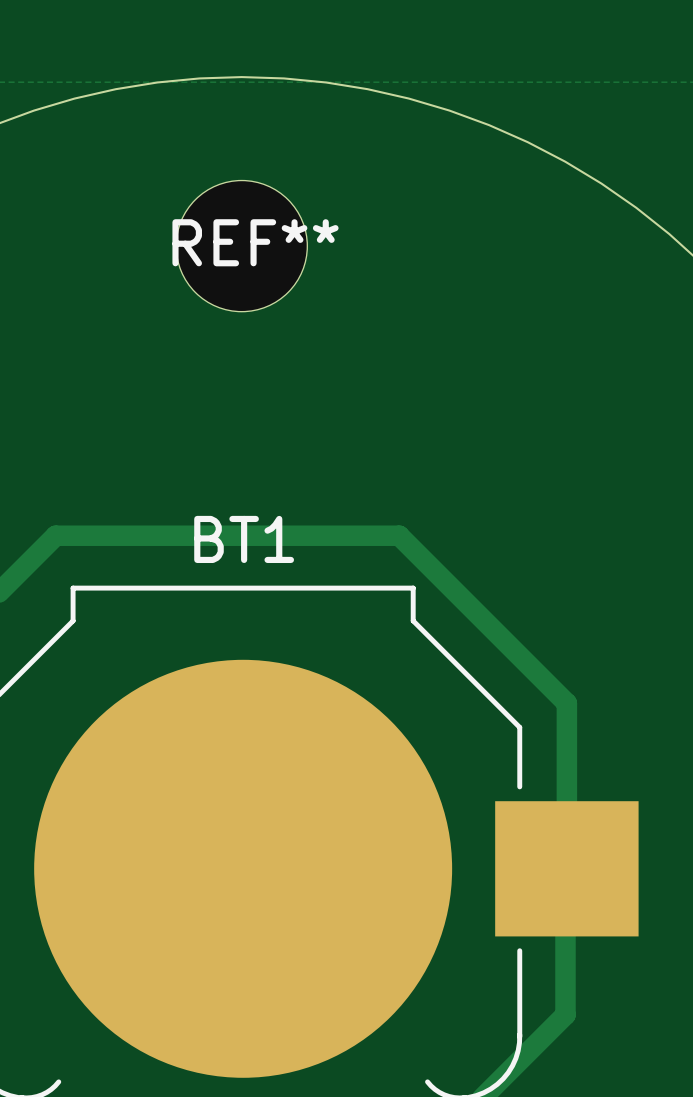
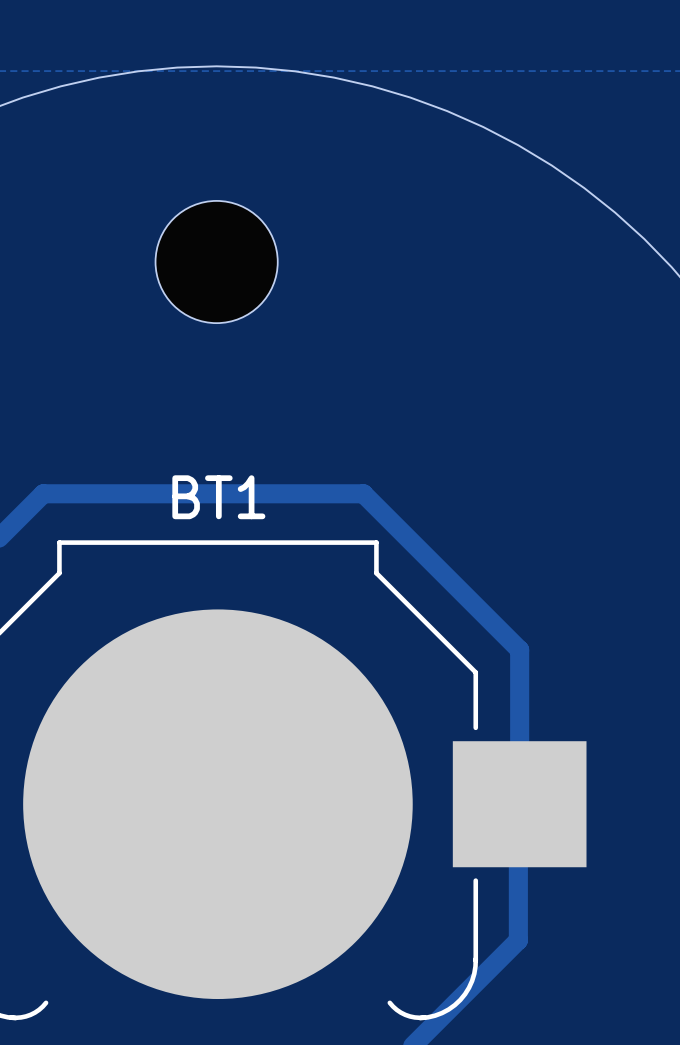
REF** name: REF** (255, 242) -> none
REF** position: (241, 246) -> (216, 262)

